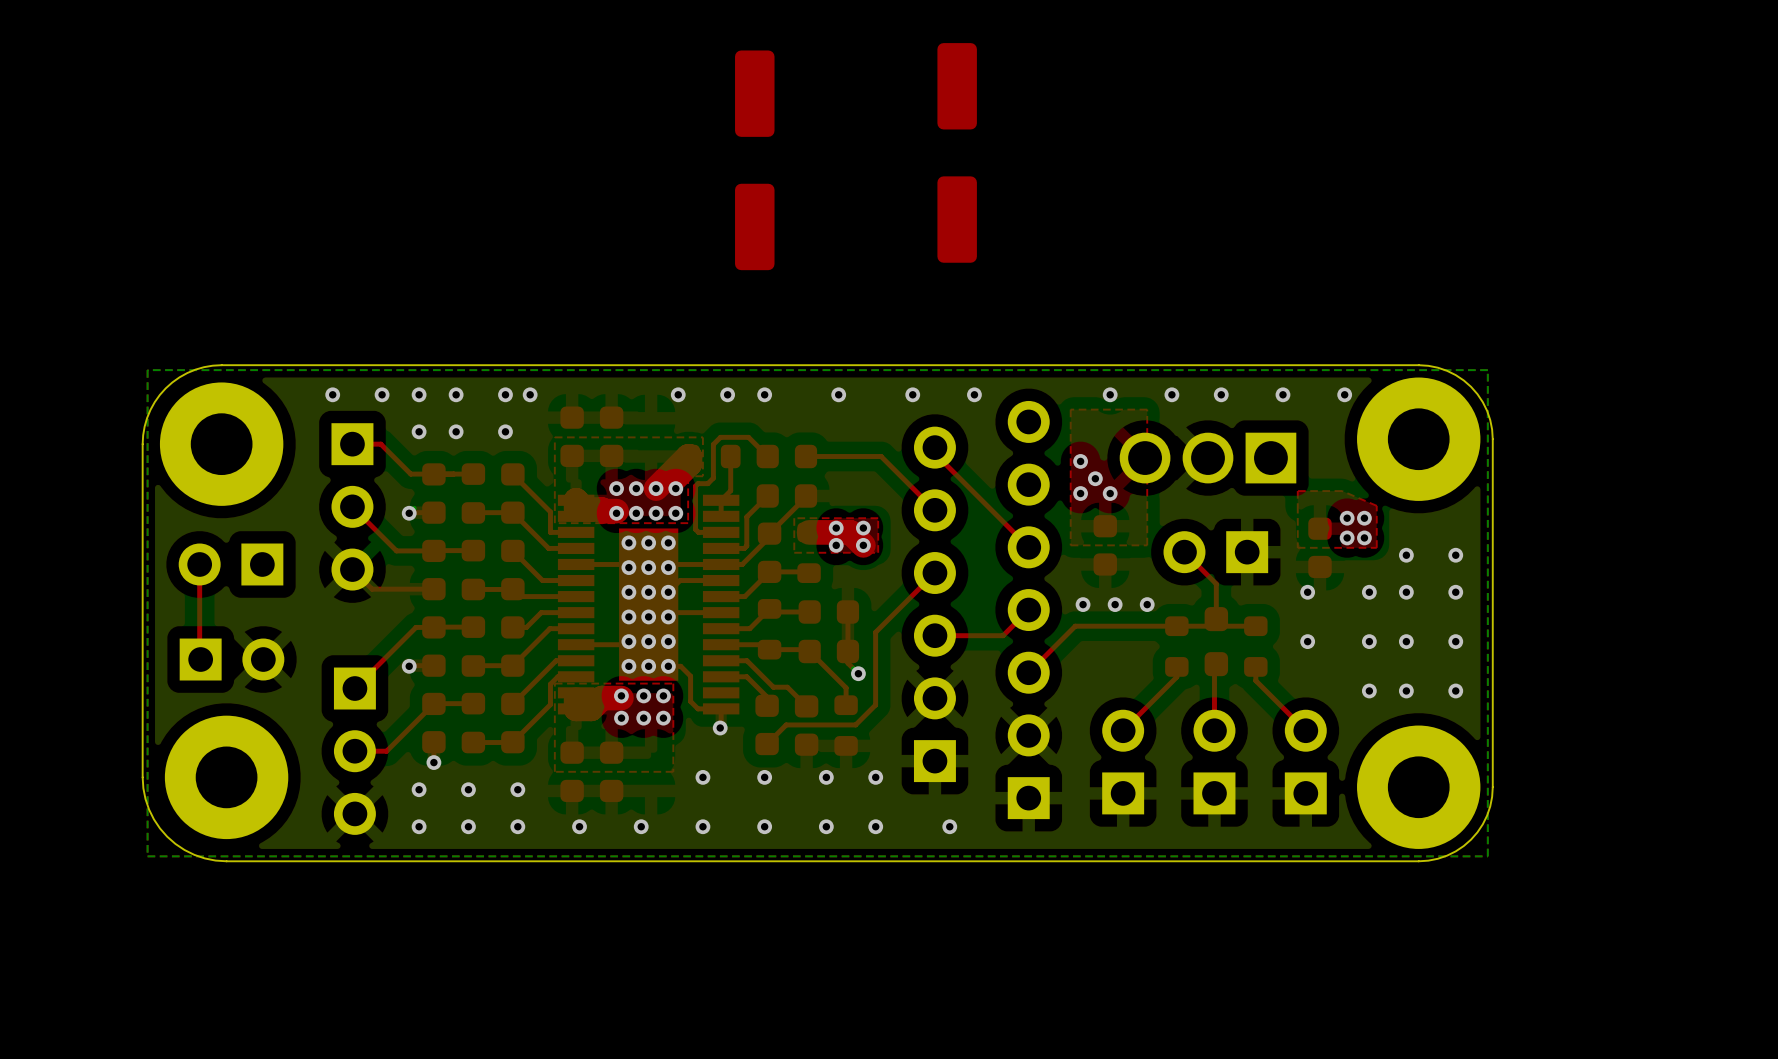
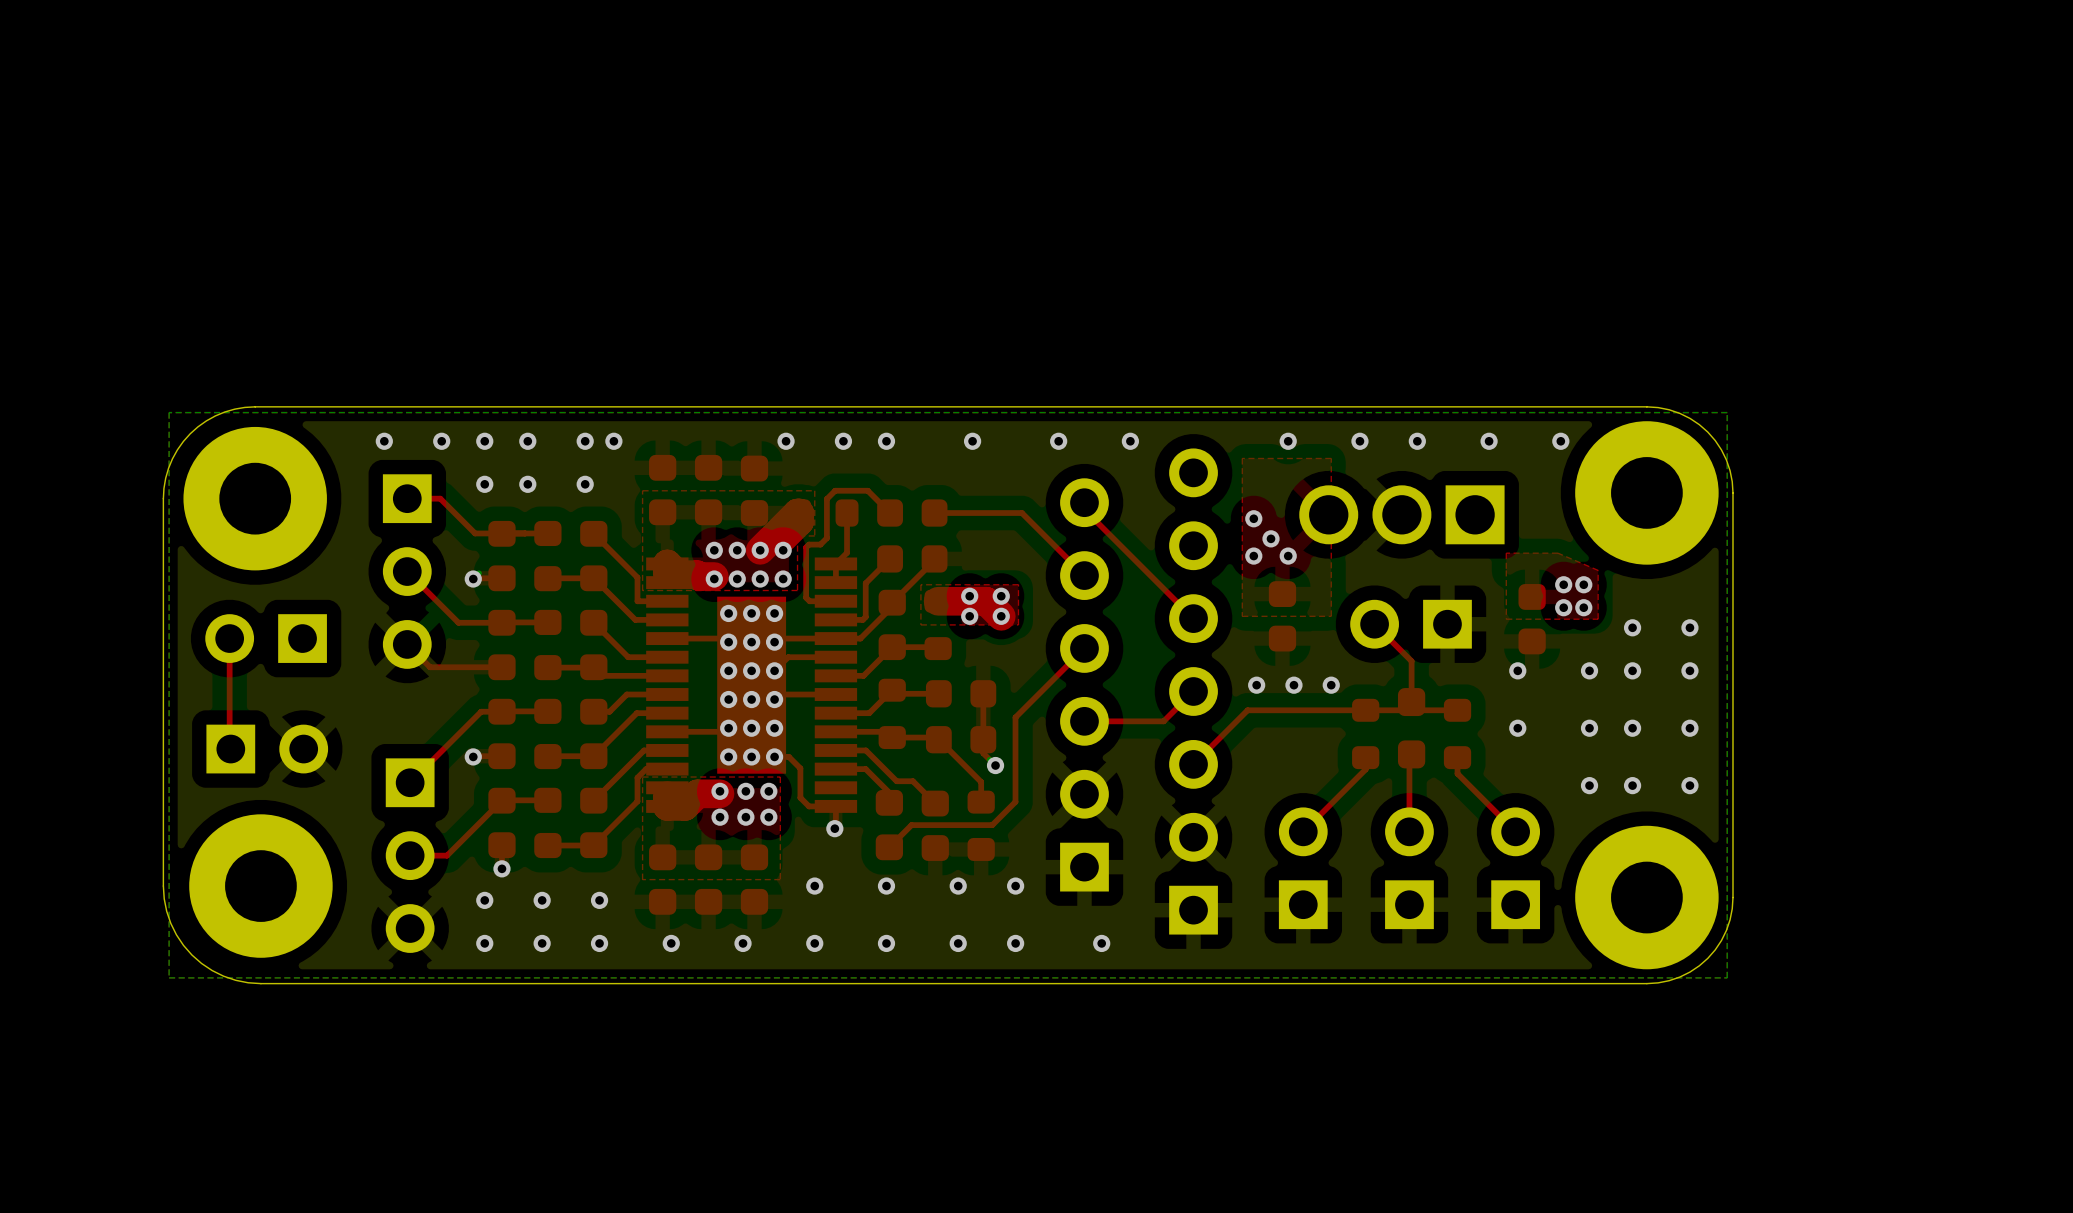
part: (957, 152) -> none
part: (754, 160) -> none
part: none -> (754, 490)
part: none -> (754, 879)

